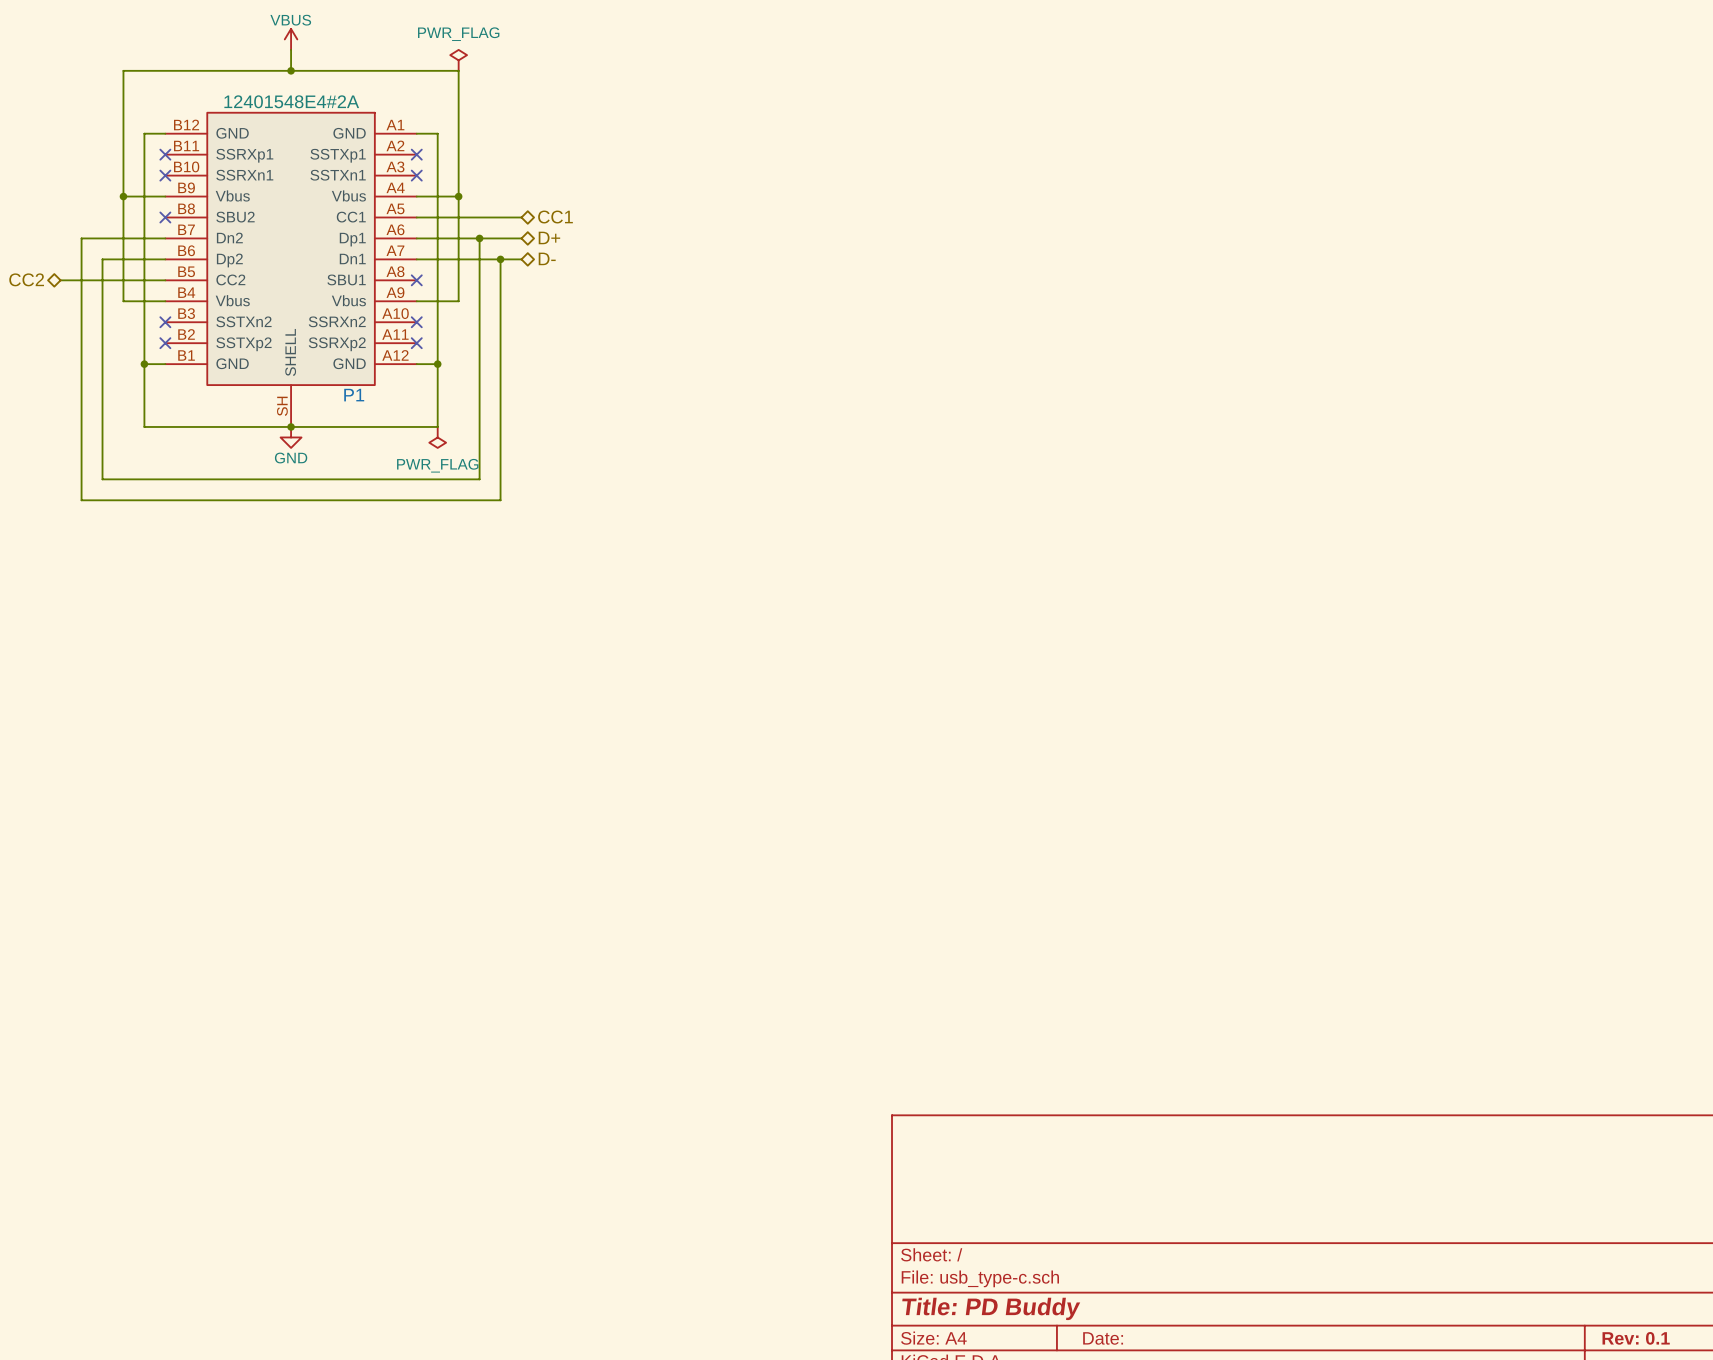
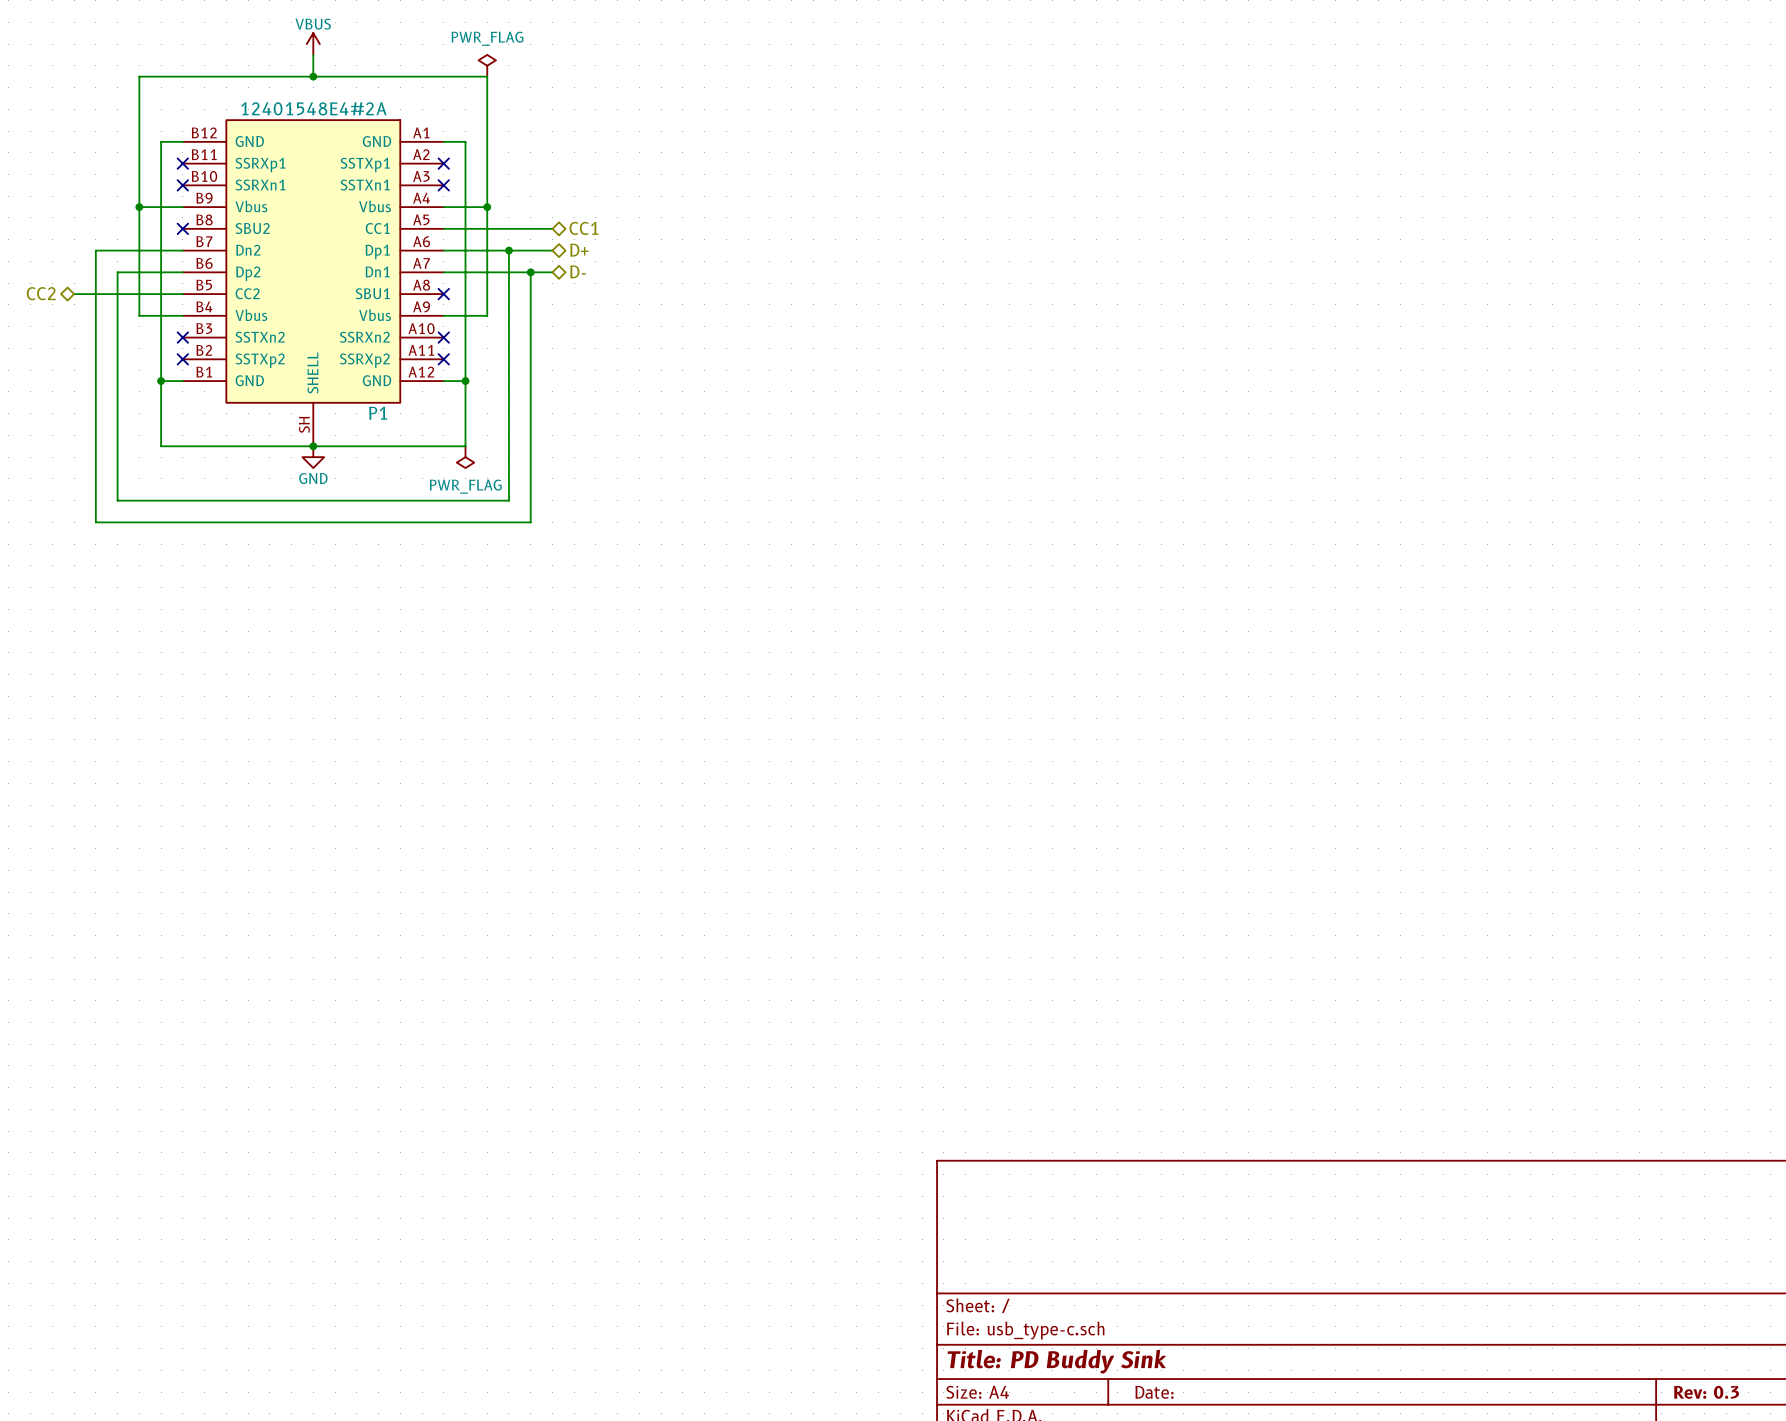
title block: Title: PD Buddy (991, 1308) -> Title: PD Buddy Sink (1056, 1361)
title block: Rev: 0.1 (1636, 1338) -> Rev: 0.3 (1706, 1392)

